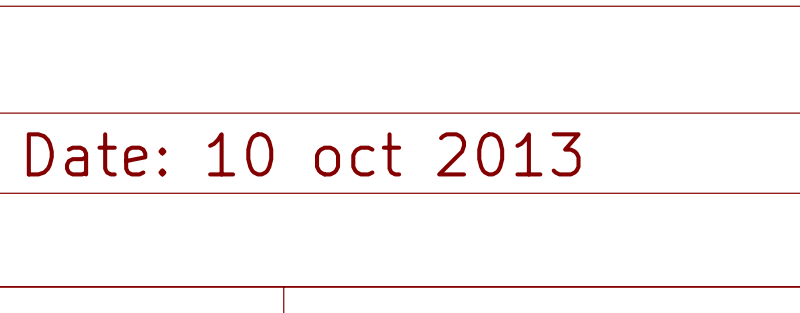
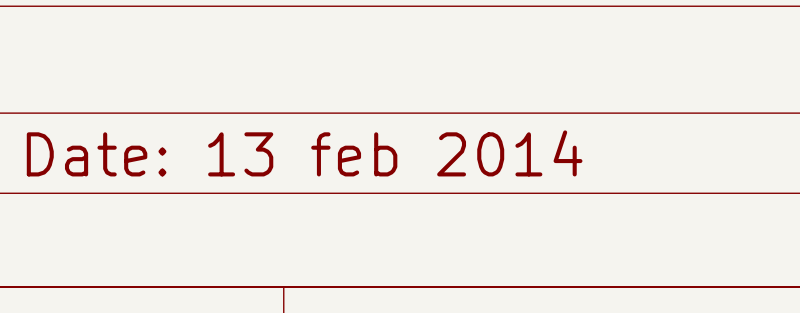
title block: Date: 10 oct 2013 (303, 154) -> Date: 13 feb 2014 (304, 153)

